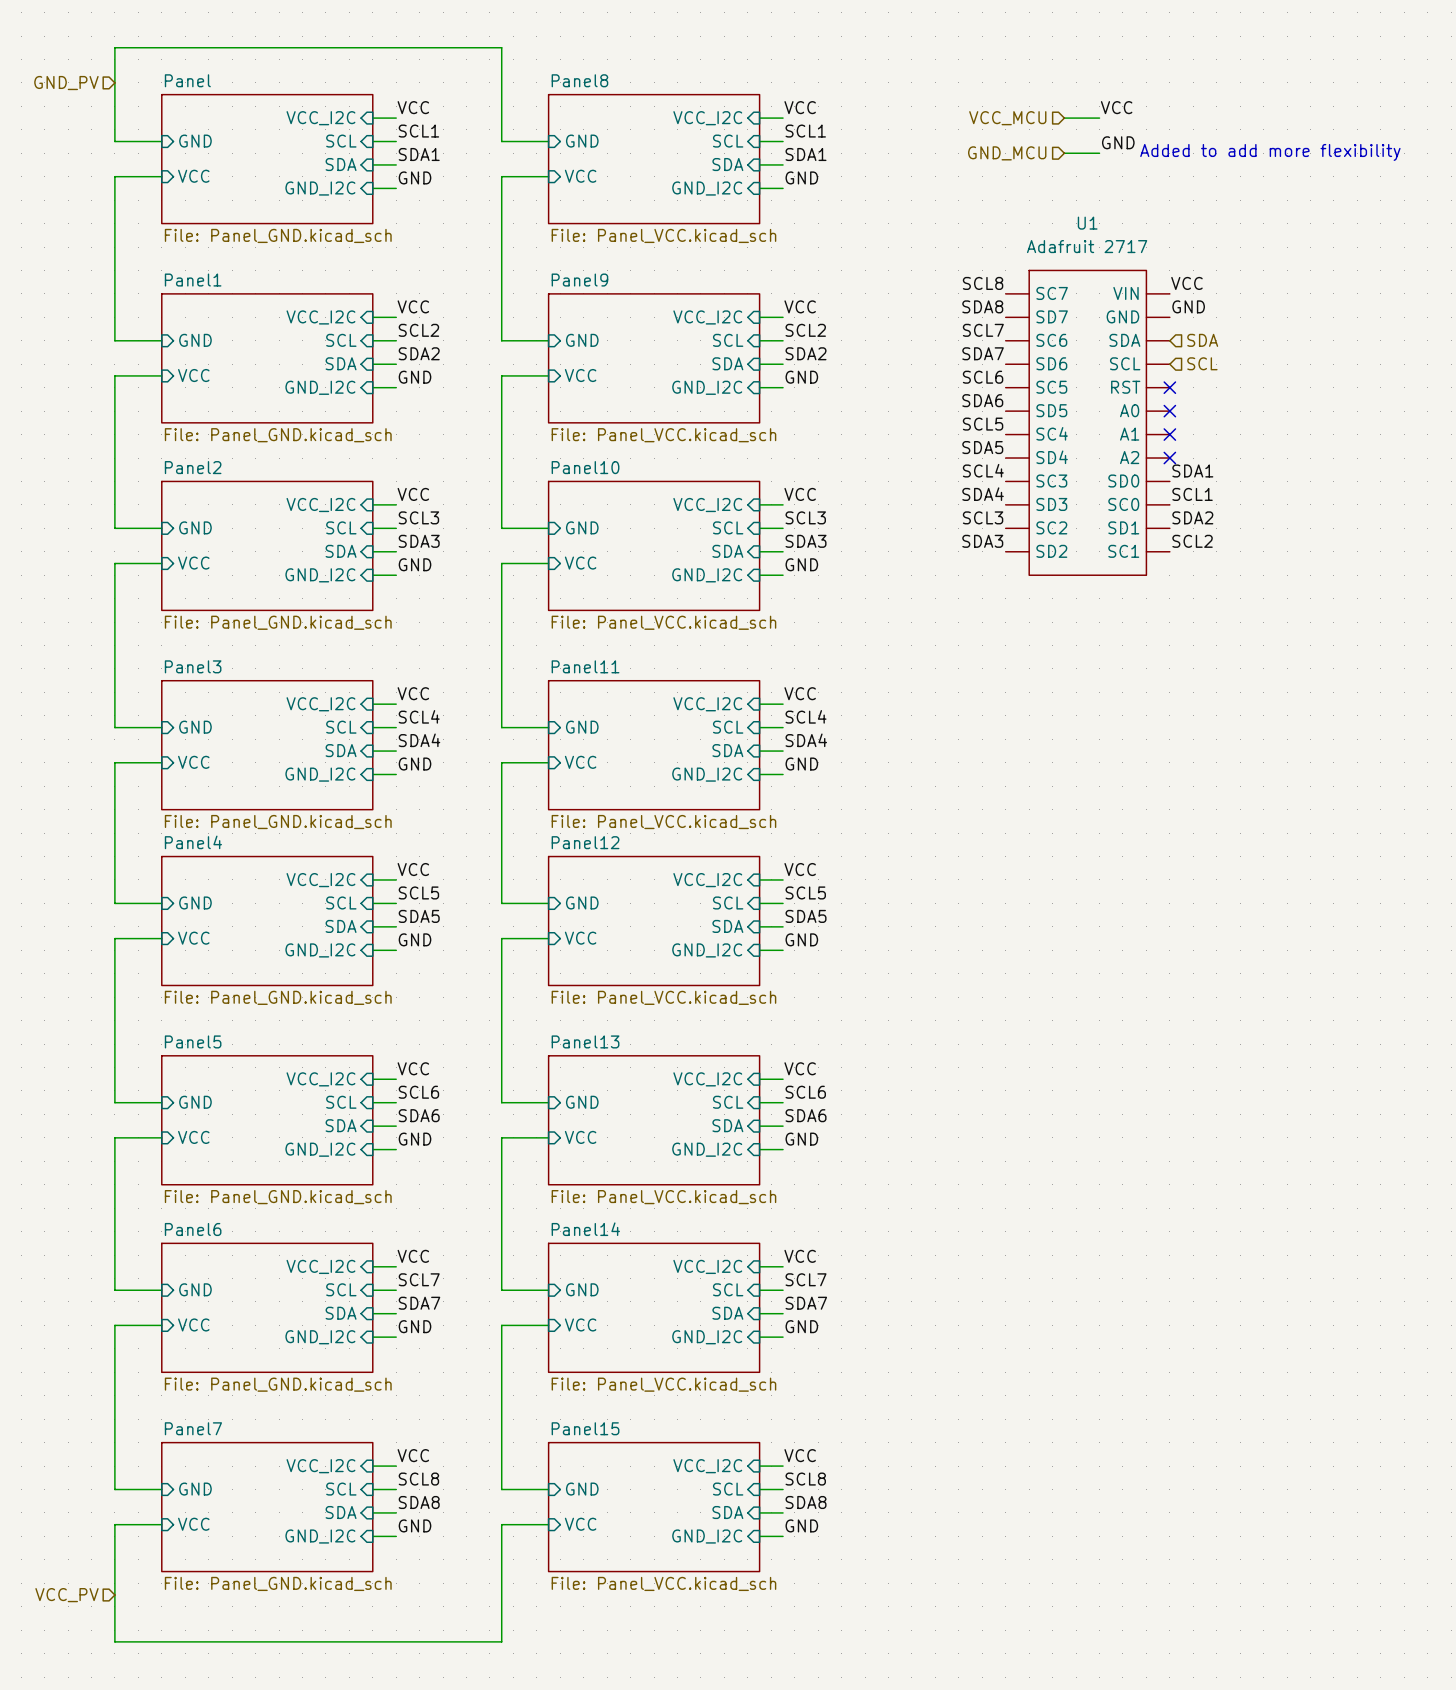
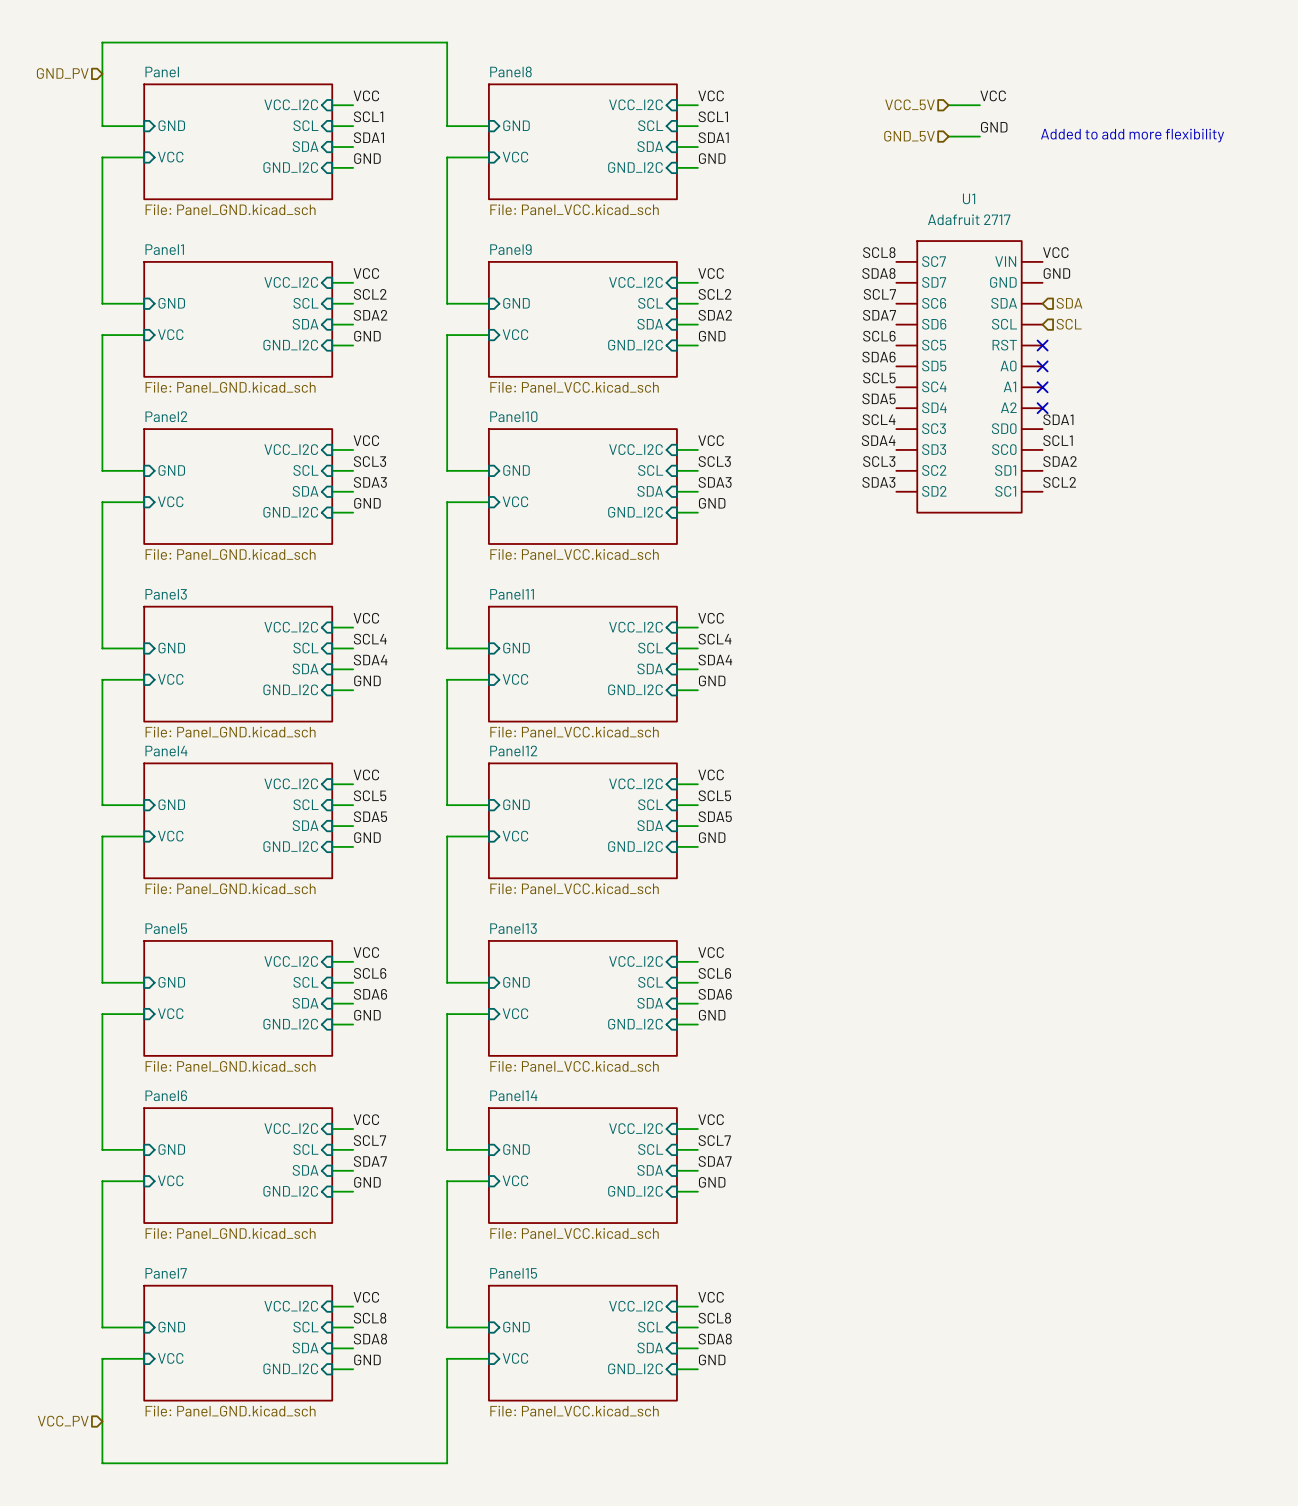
hierarchical label: VCC_MCU (1007, 118) -> VCC_5V (910, 104)
hierarchical label: GND_MCU (1007, 153) -> GND_5V (909, 136)

